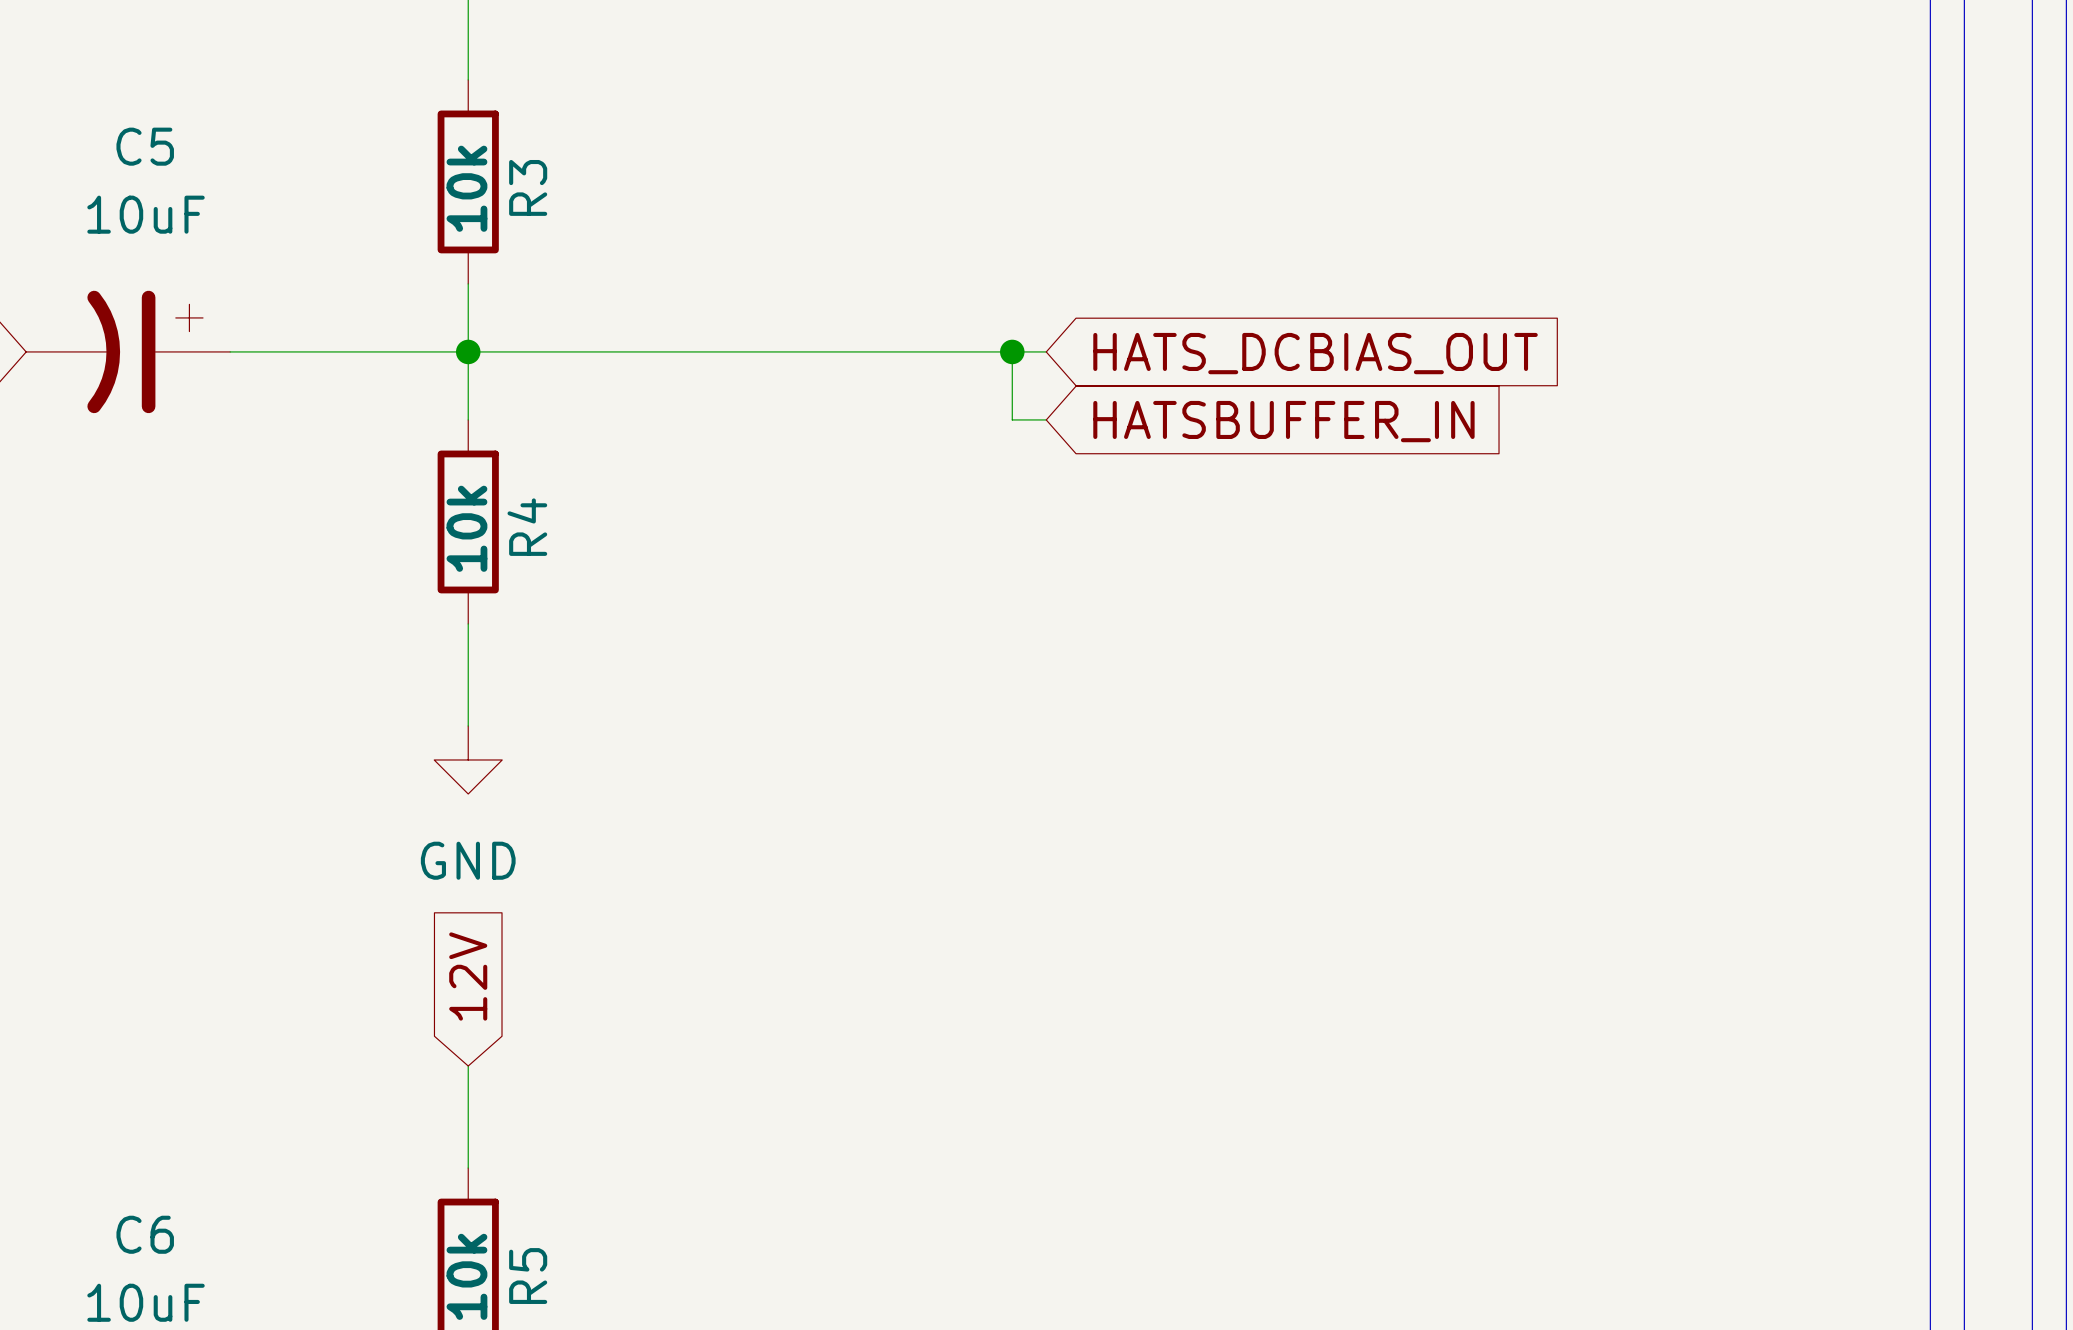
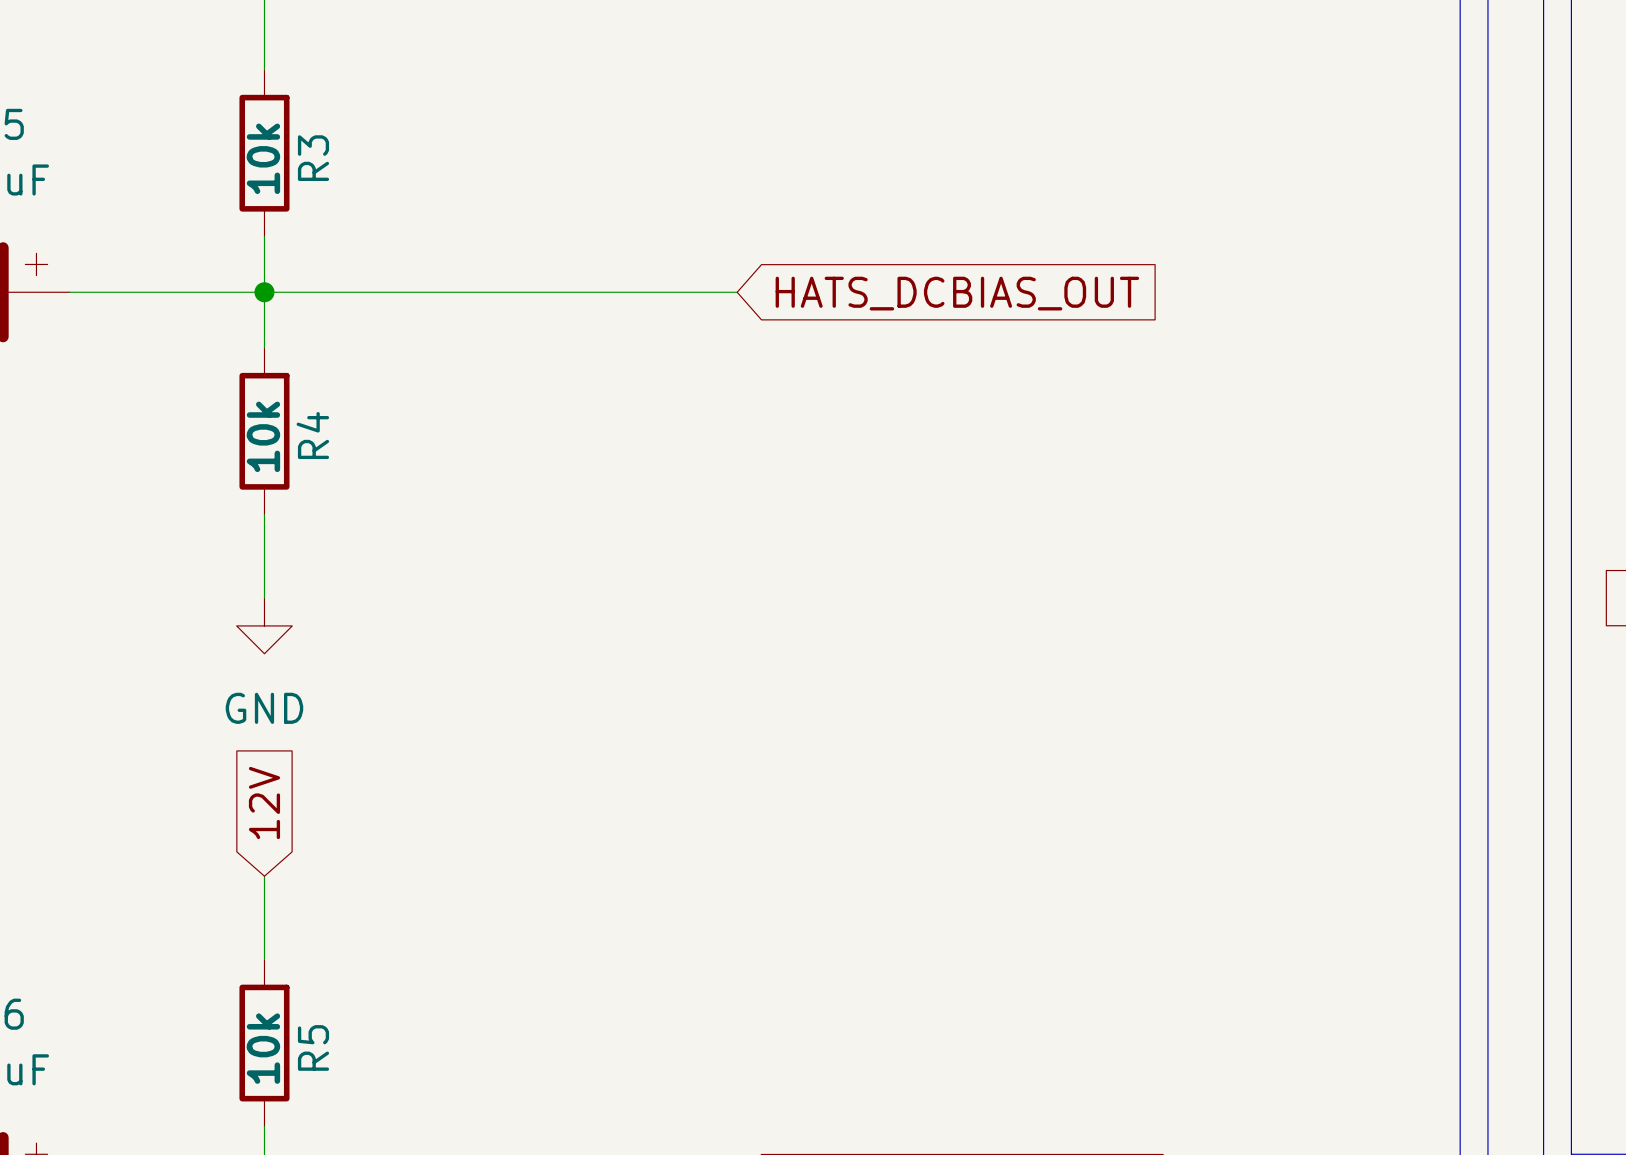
wire: (1012, 351) (1012, 419) (1046, 419) -> none
junction: (1012, 351) -> none
global label: HATSBUFFER_IN (1283, 421) -> none

